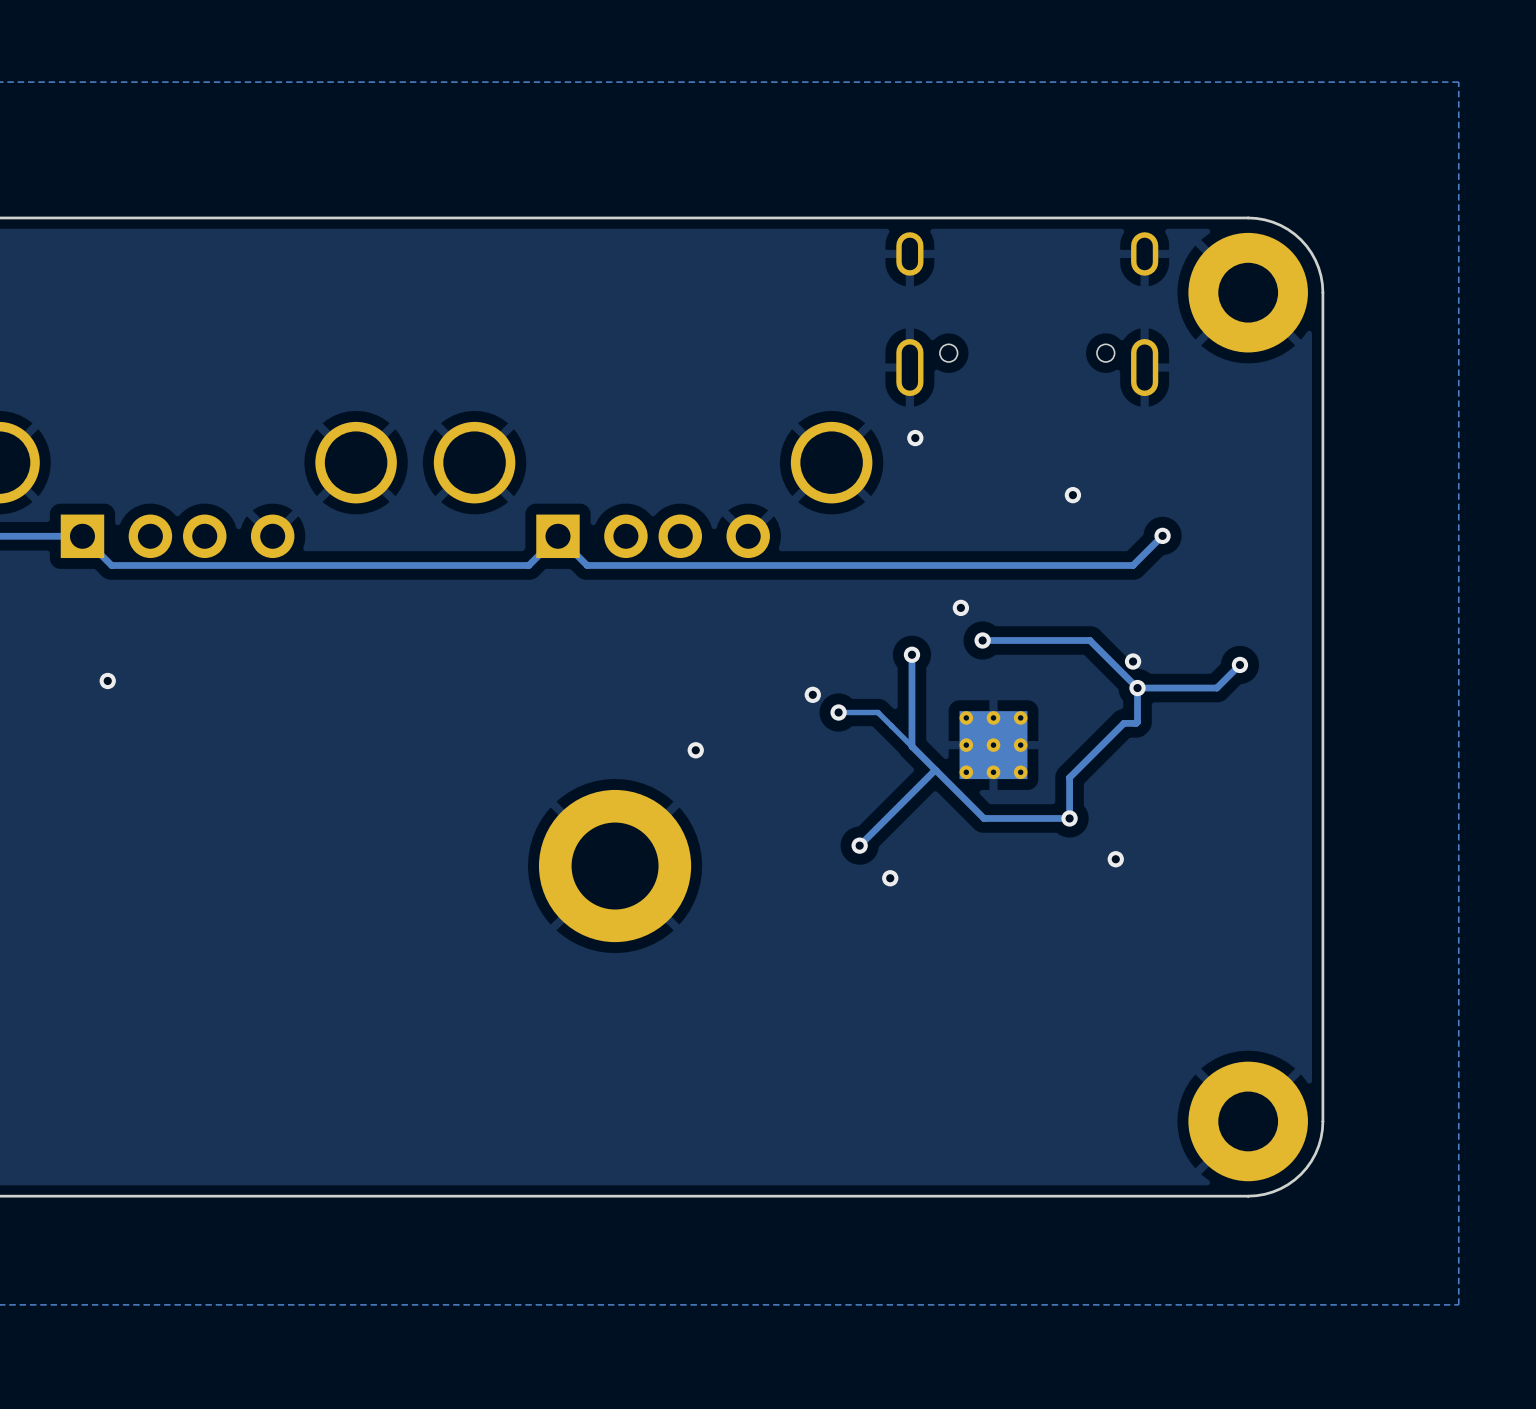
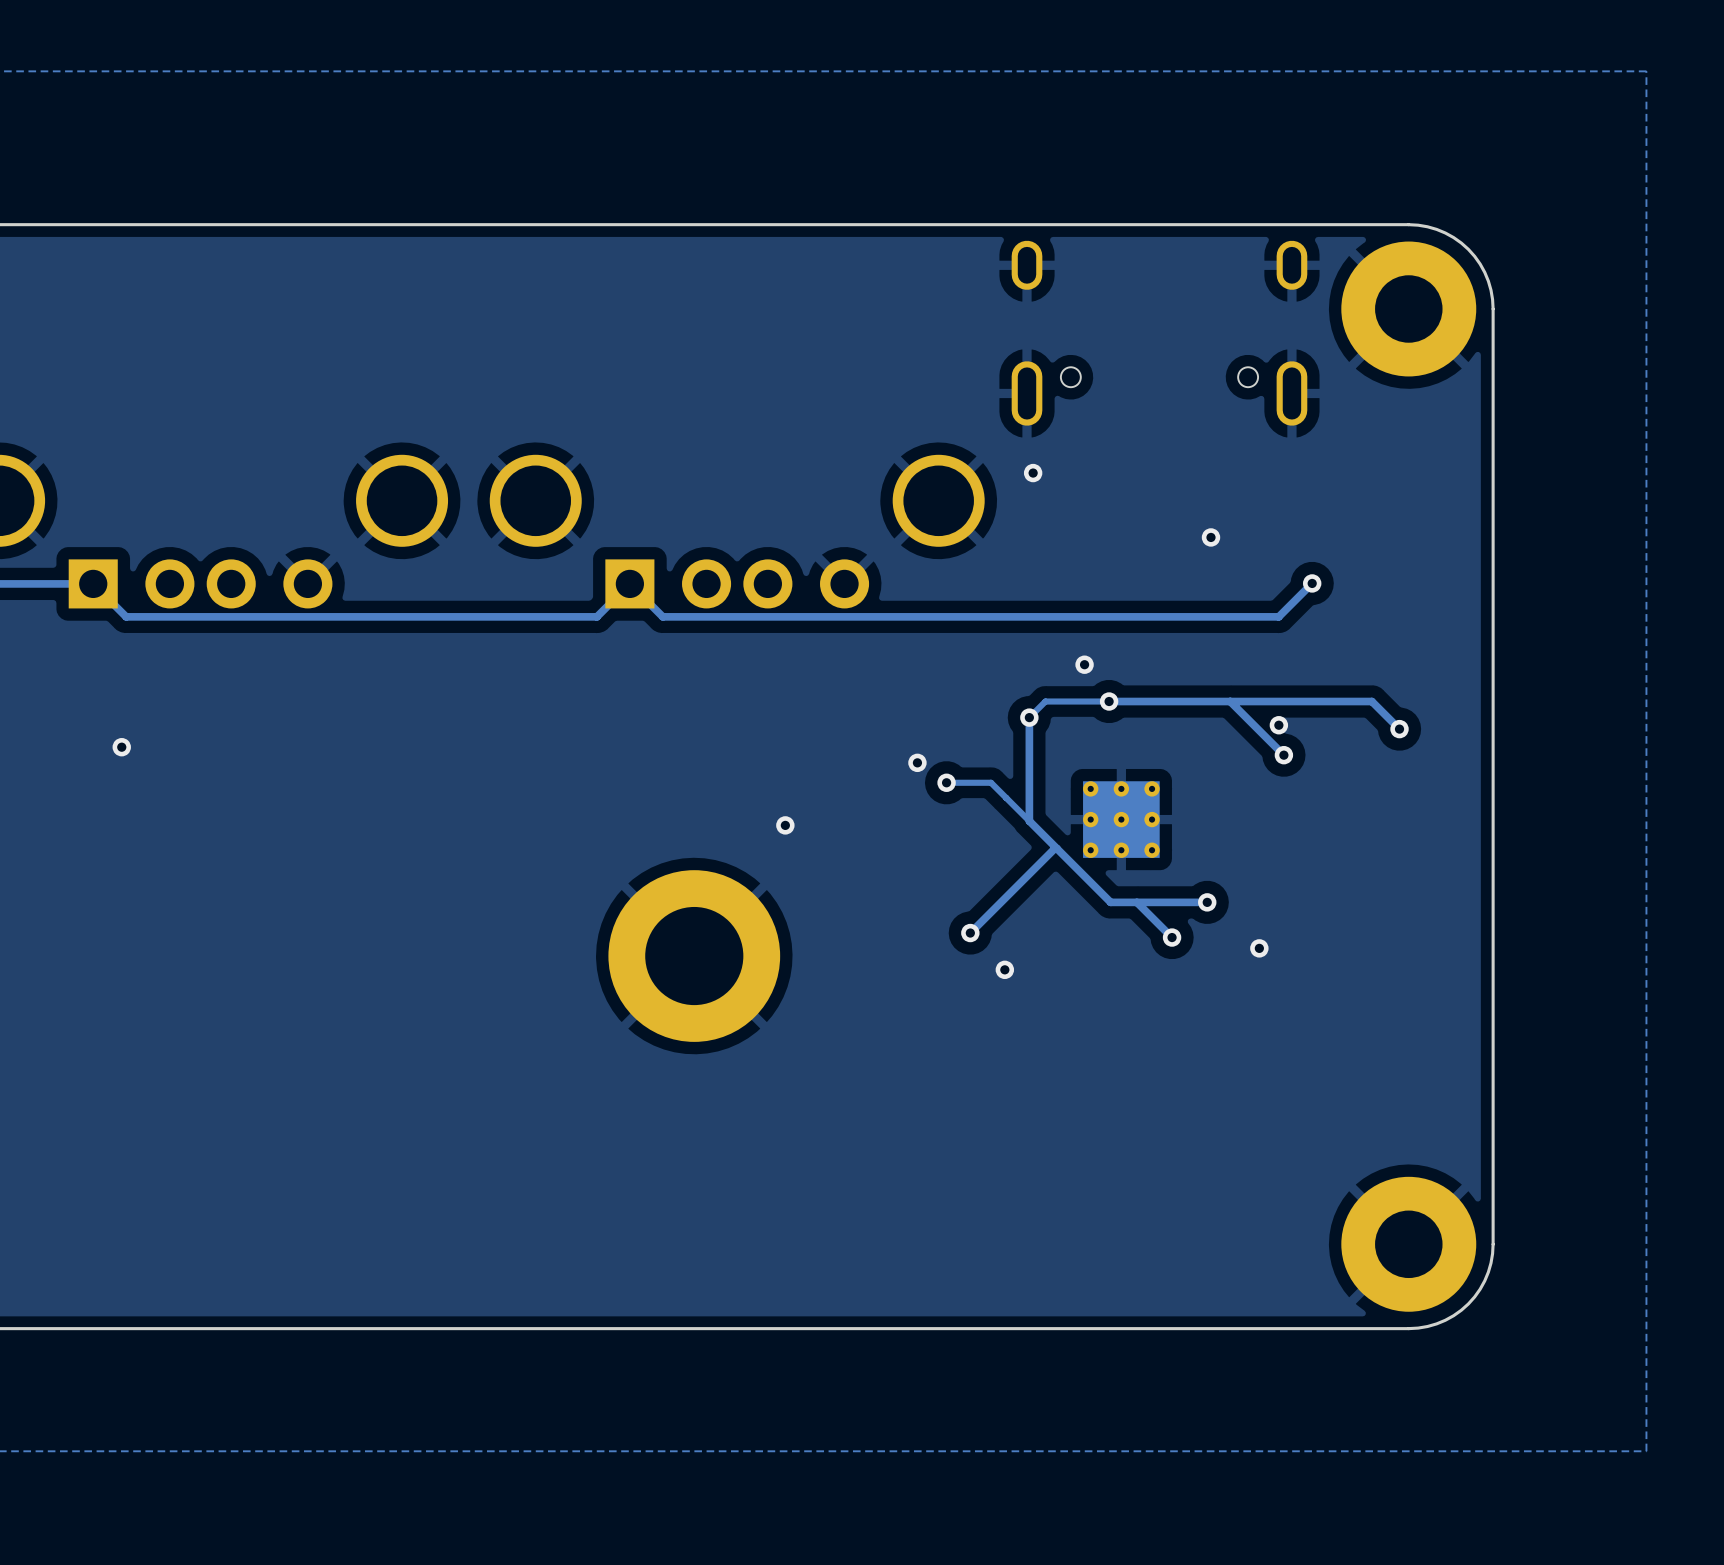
track: none -> (1109, 701) (1045, 701) (1029, 717)
track: (1239, 664) (1216, 688) (1137, 688) (1137, 722) (1123, 723) (1069, 777) (1069, 818) -> (1399, 729) (1371, 701) (1230, 701)
track: none -> (1110, 902) (1136, 902) (1172, 937)
via: none -> (1172, 937)

